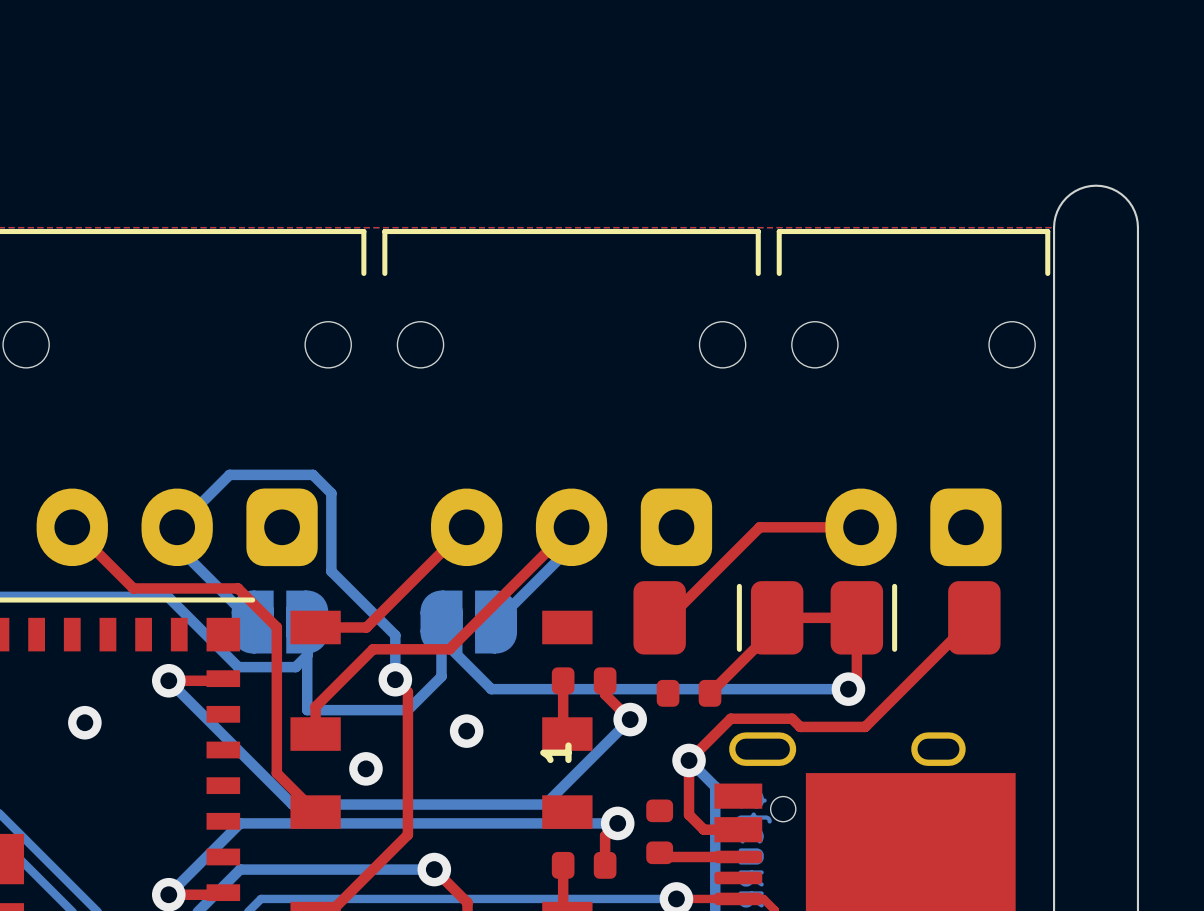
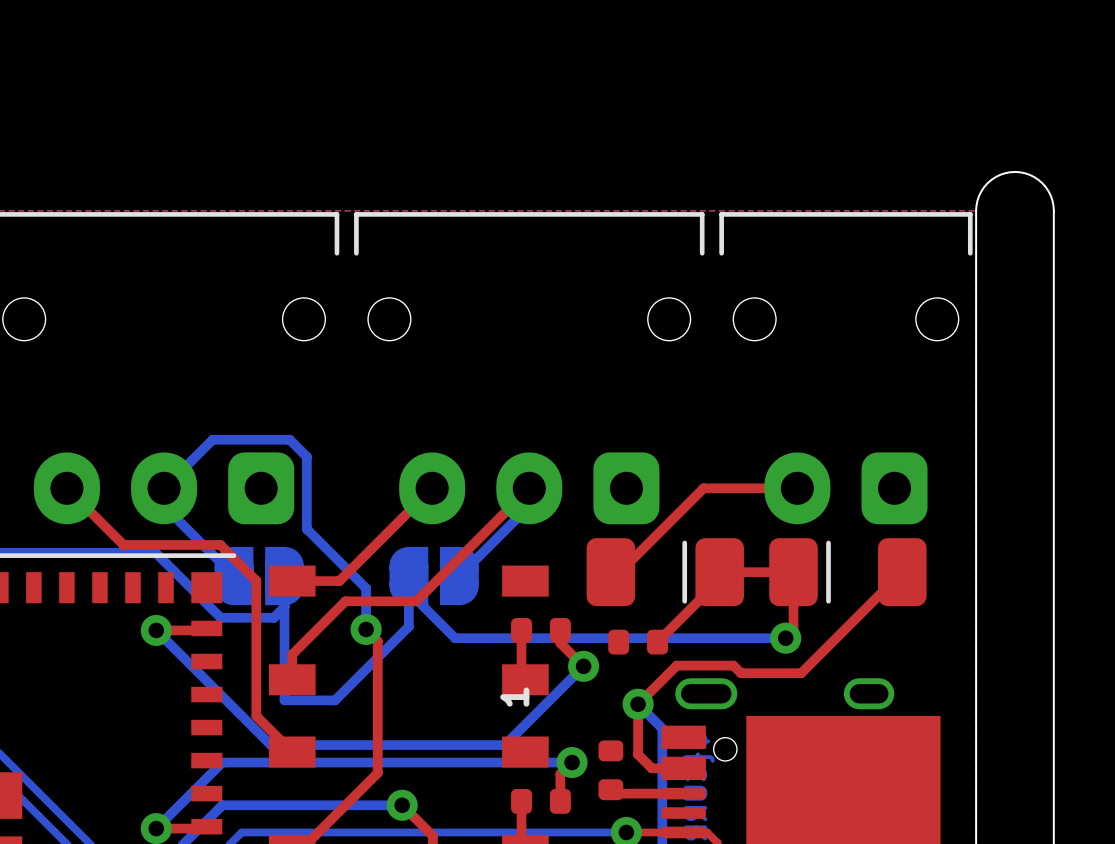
bottom track: (307, 710) (407, 710) -> (284, 657) (284, 700) (335, 700) (377, 657)
via: (84, 722) -> none
via: (466, 731) -> none
via: (365, 768) -> none

